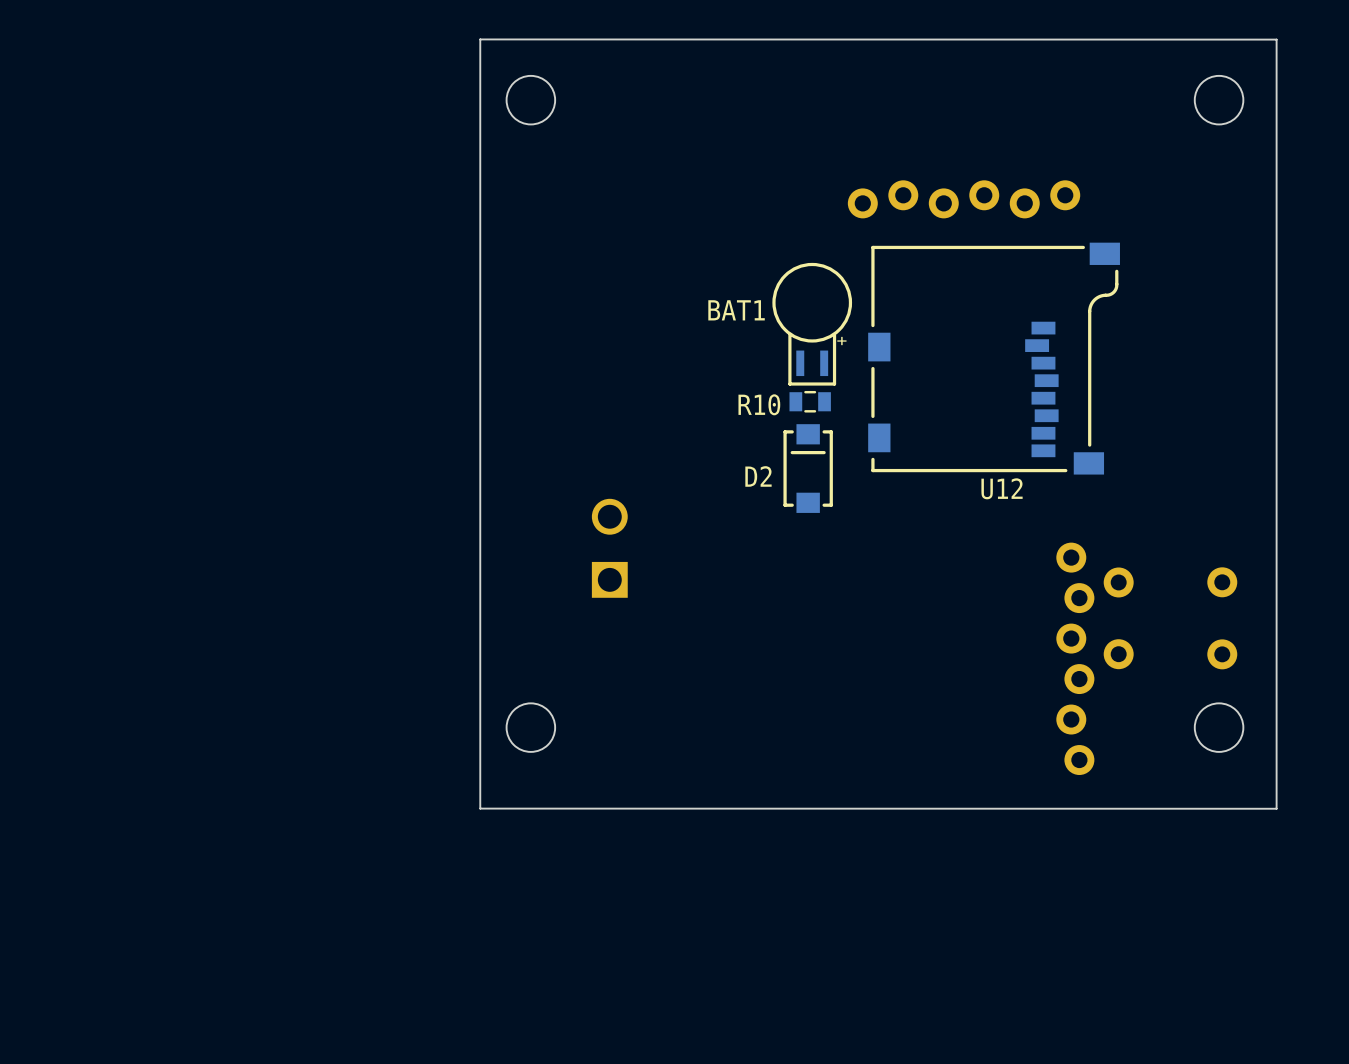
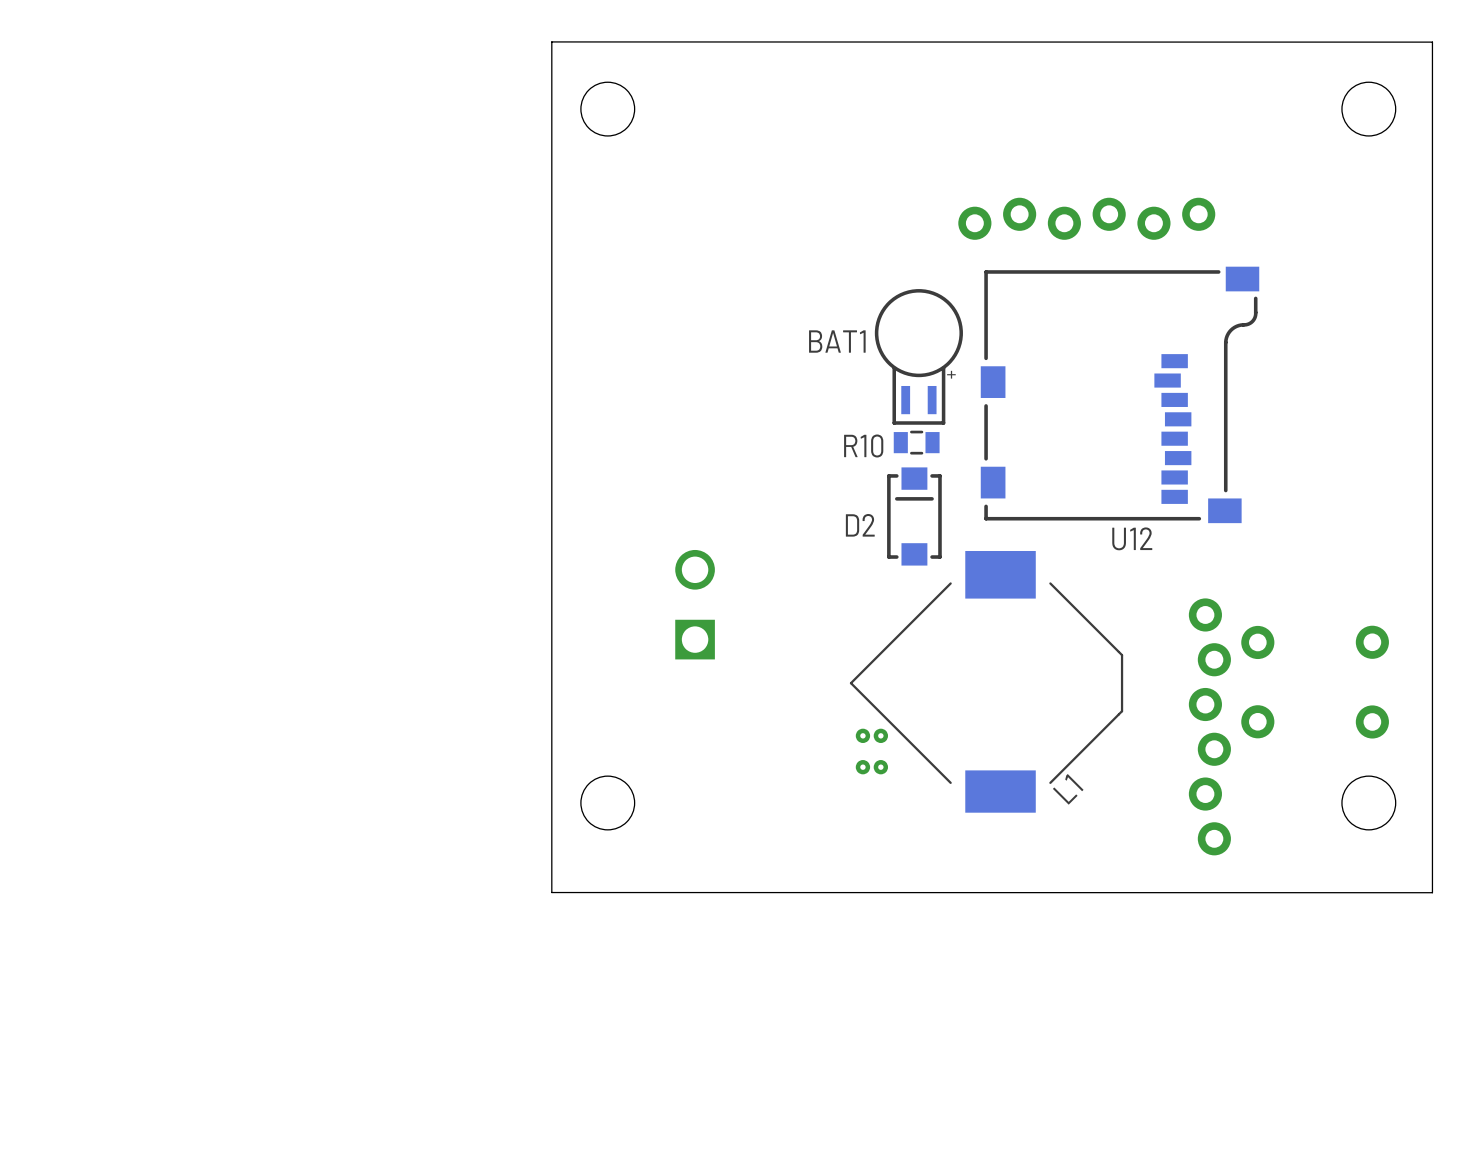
L1: none -> (986, 681)
part: none -> (871, 751)

